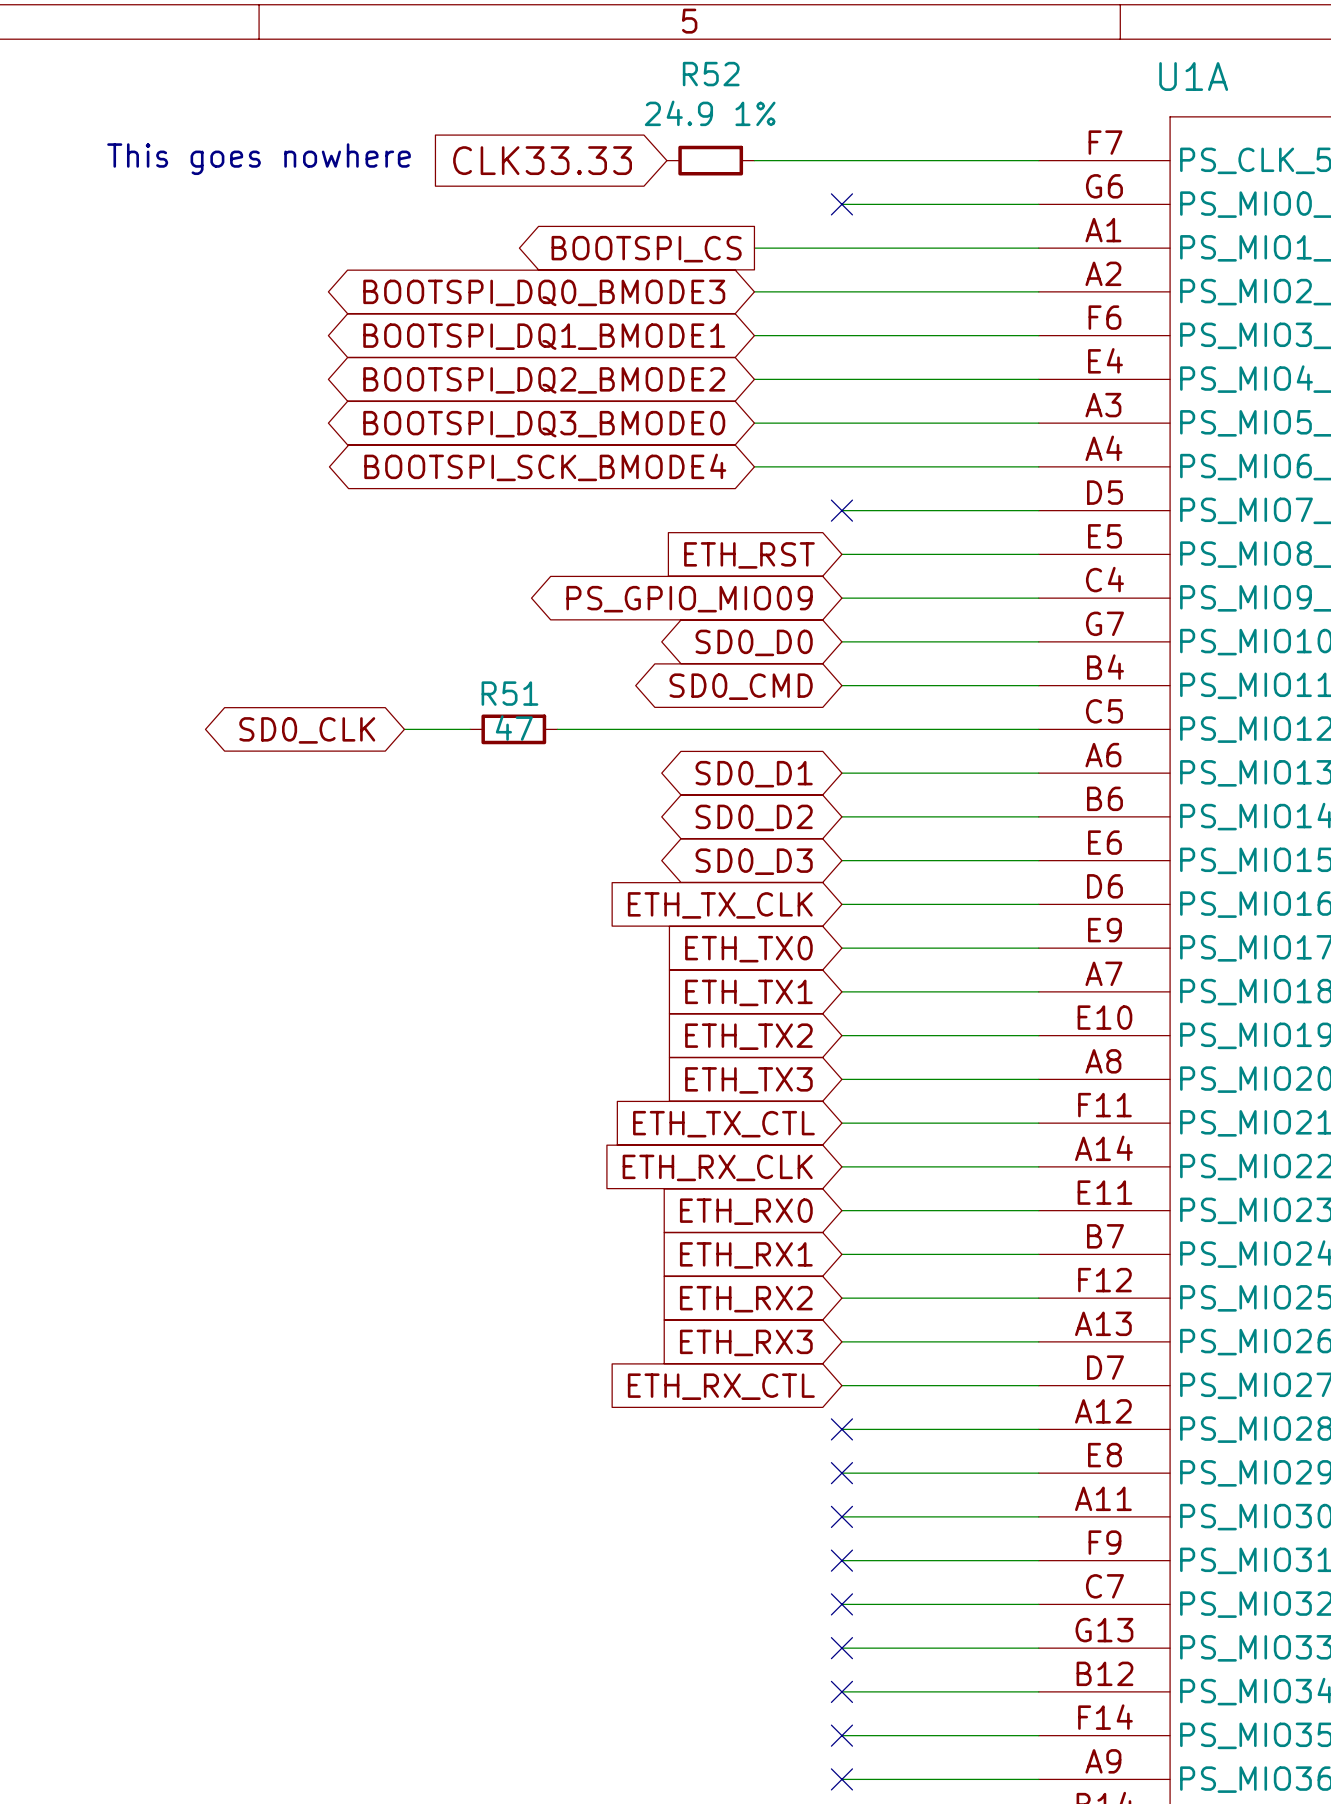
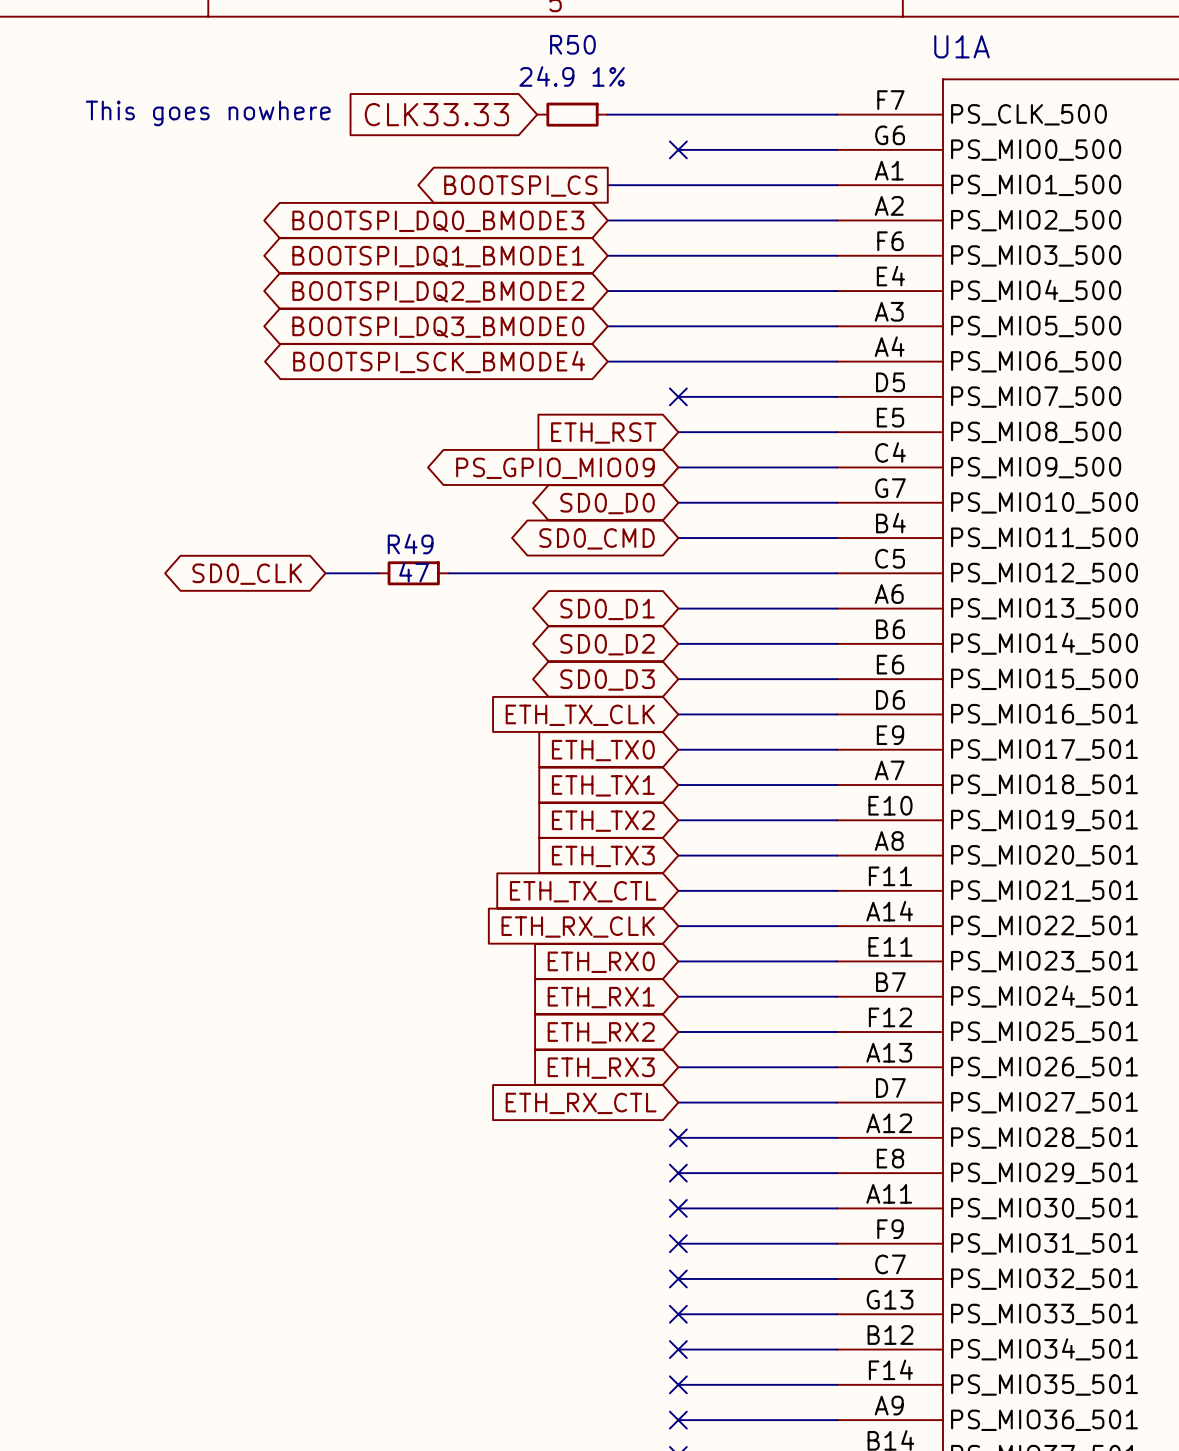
R52 name: R52 (711, 74) -> R50 (572, 44)
R51 name: R51 (509, 693) -> R49 (410, 544)

